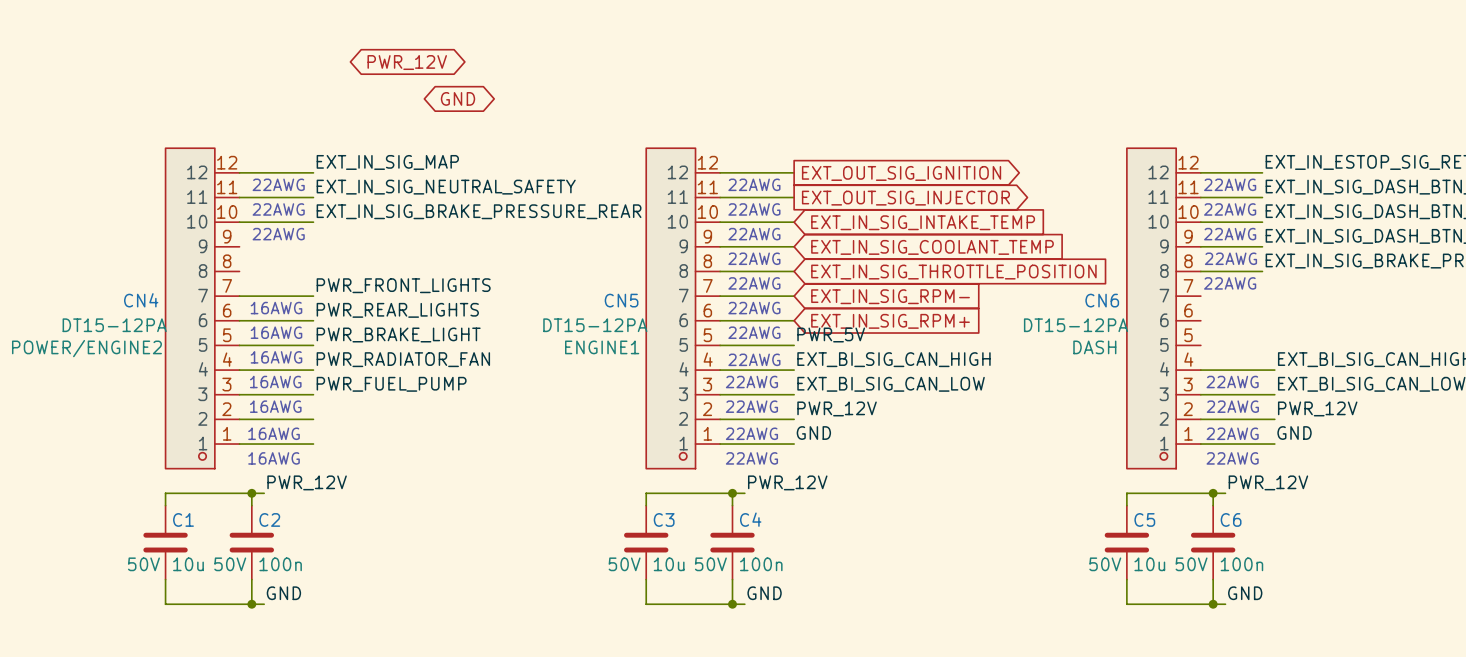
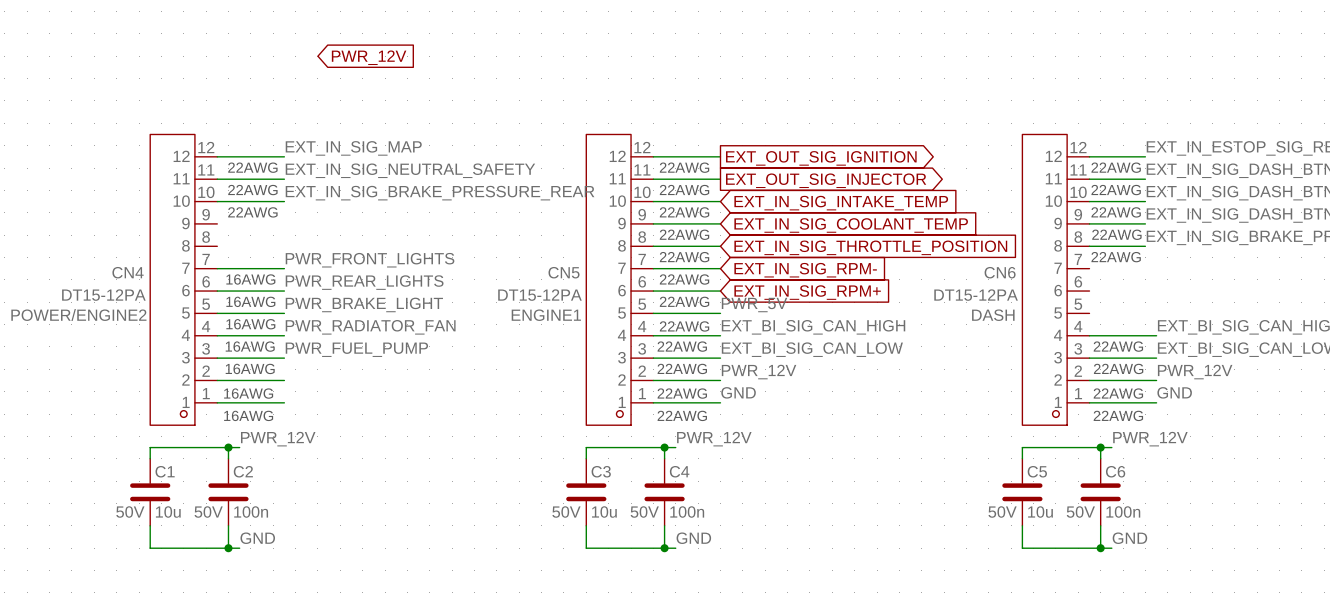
global label shape: bidirectional (407, 62) -> input (369, 57)
global label: GND (457, 98) -> none

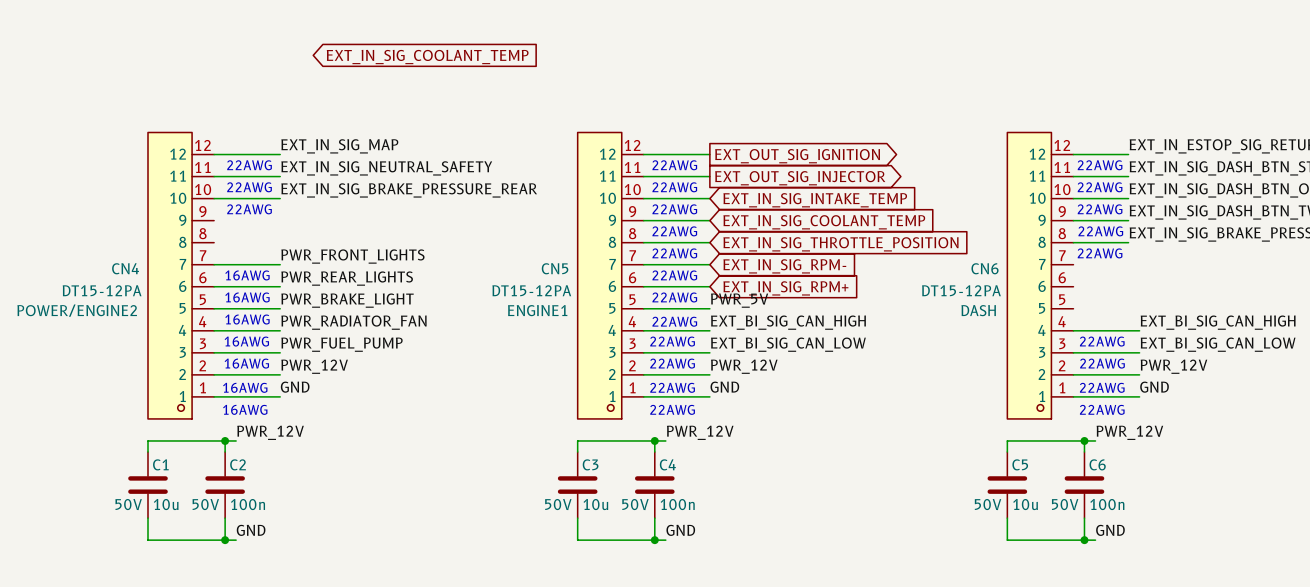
global label: PWR_12V (369, 57) -> EXT_IN_SIG_COOLANT_TEMP (427, 57)
label: none -> PWR_12V (314, 366)
label: none -> GND (295, 387)

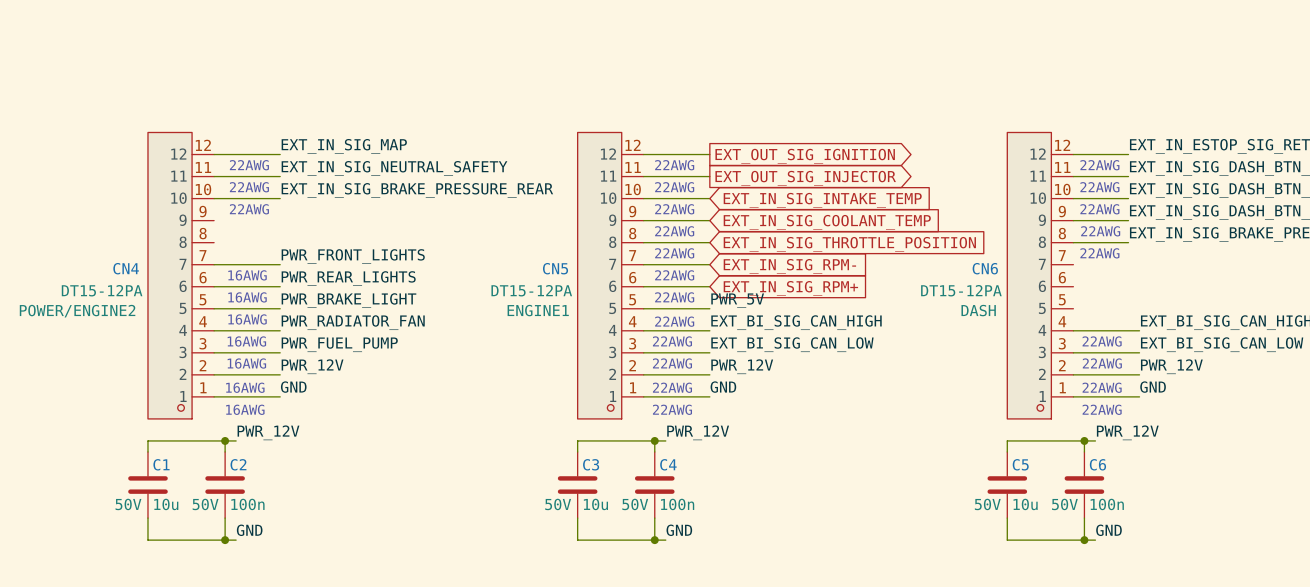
global label: EXT_IN_SIG_COOLANT_TEMP (427, 57) -> none

